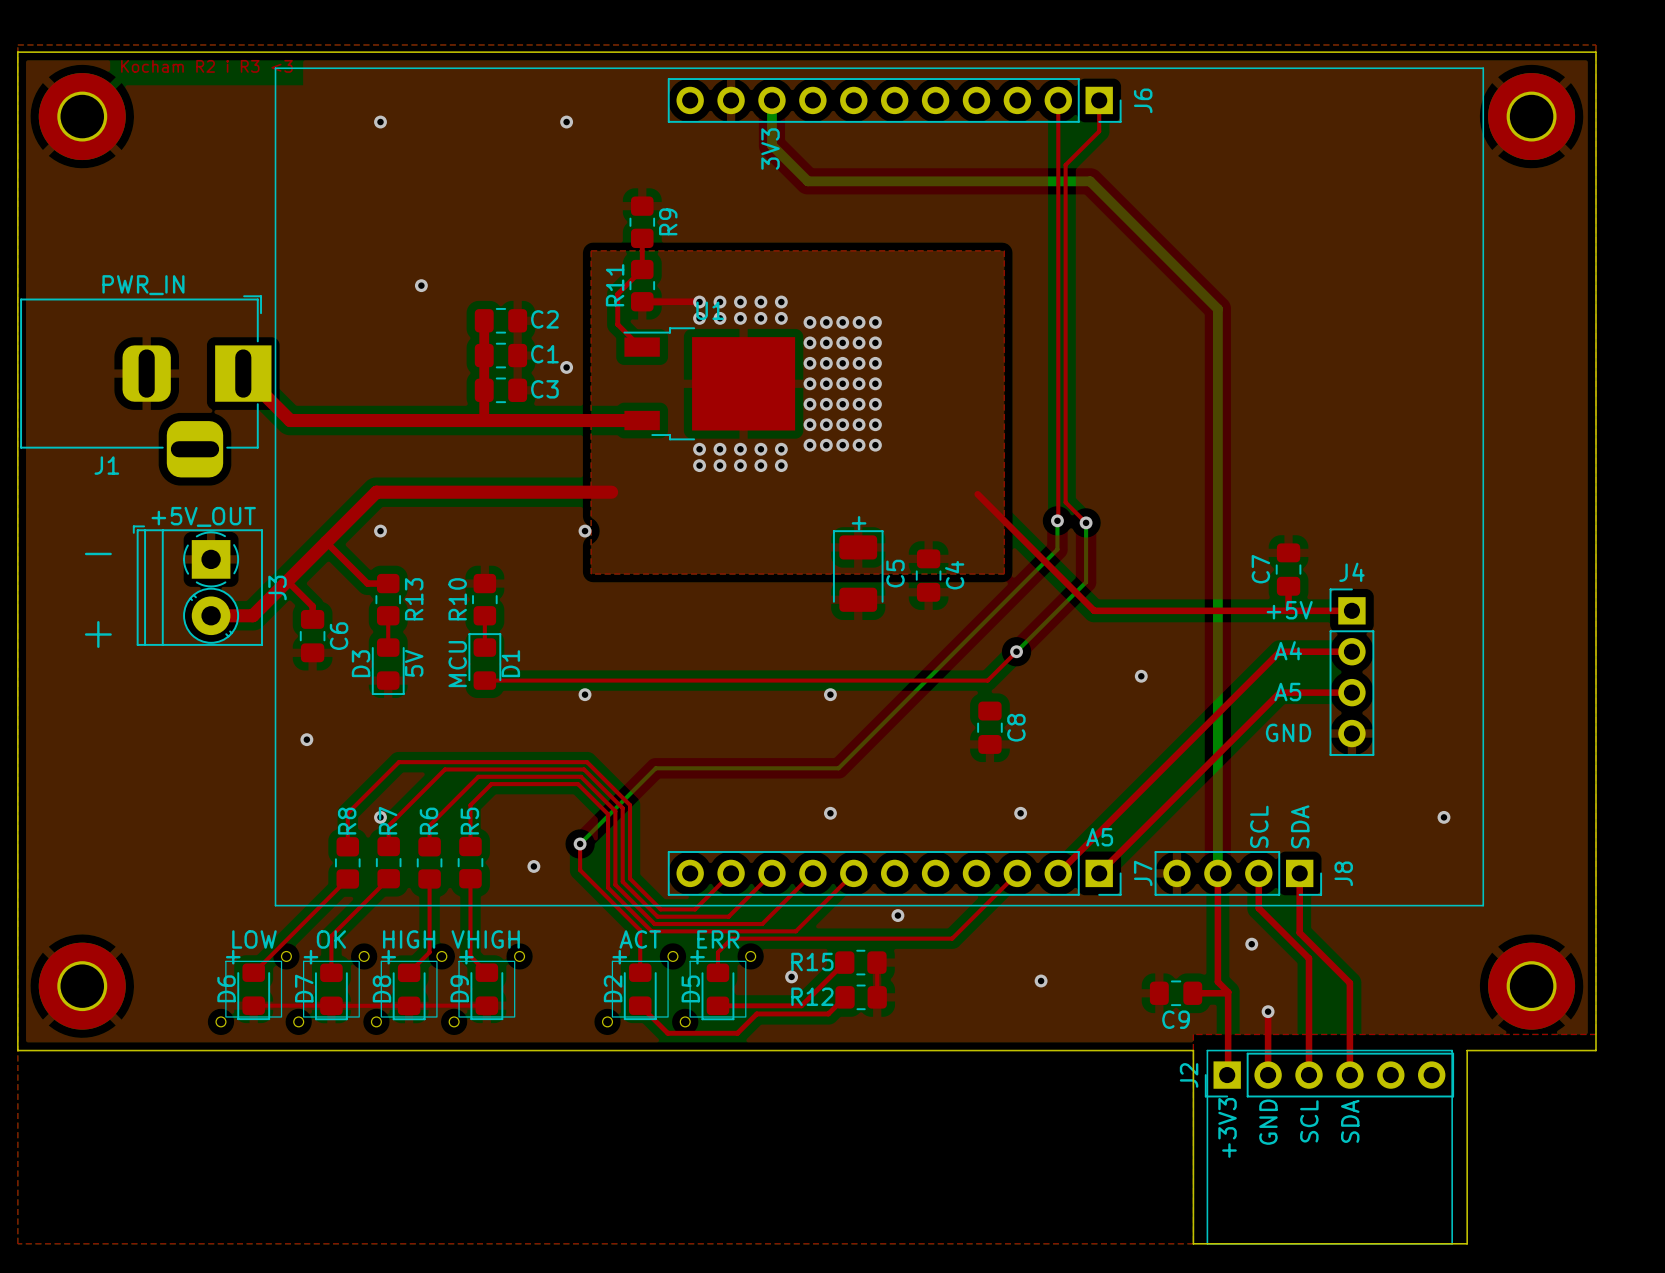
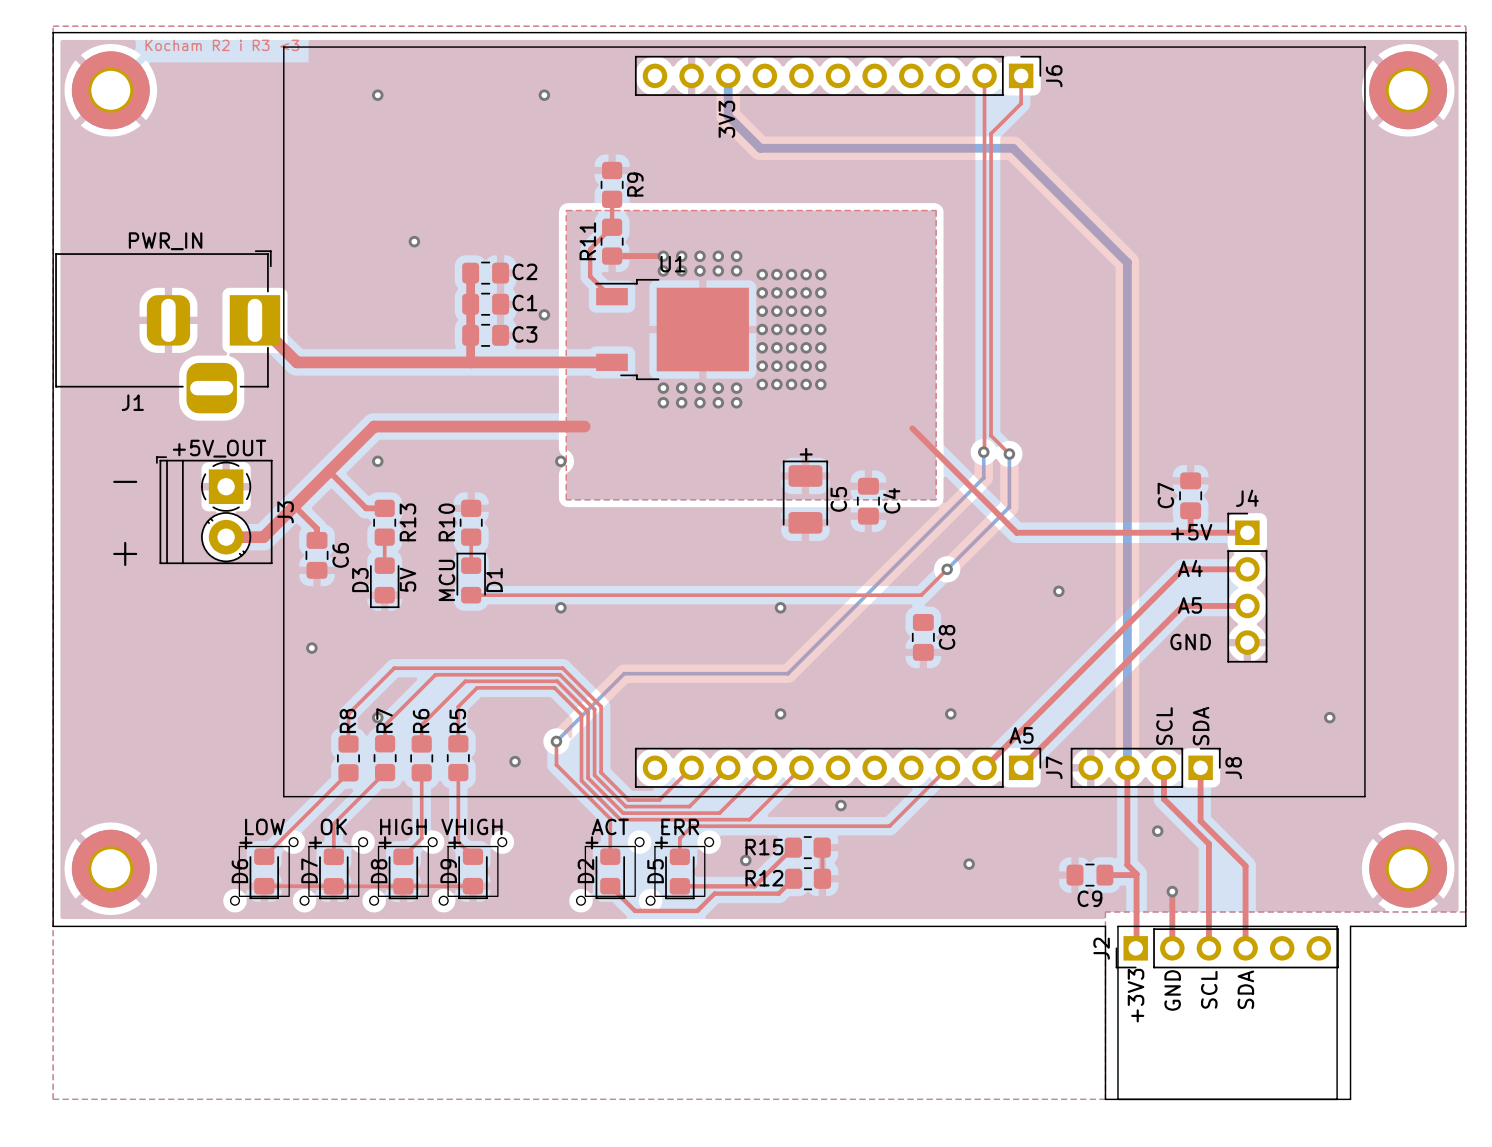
J6 footprint: [667, 78, 1122, 123] -> [634, 55, 1042, 96]
J7 footprint: [667, 851, 1122, 896] -> [634, 747, 1042, 788]
J8 footprint: [1154, 851, 1323, 896] -> [1070, 747, 1221, 788]

